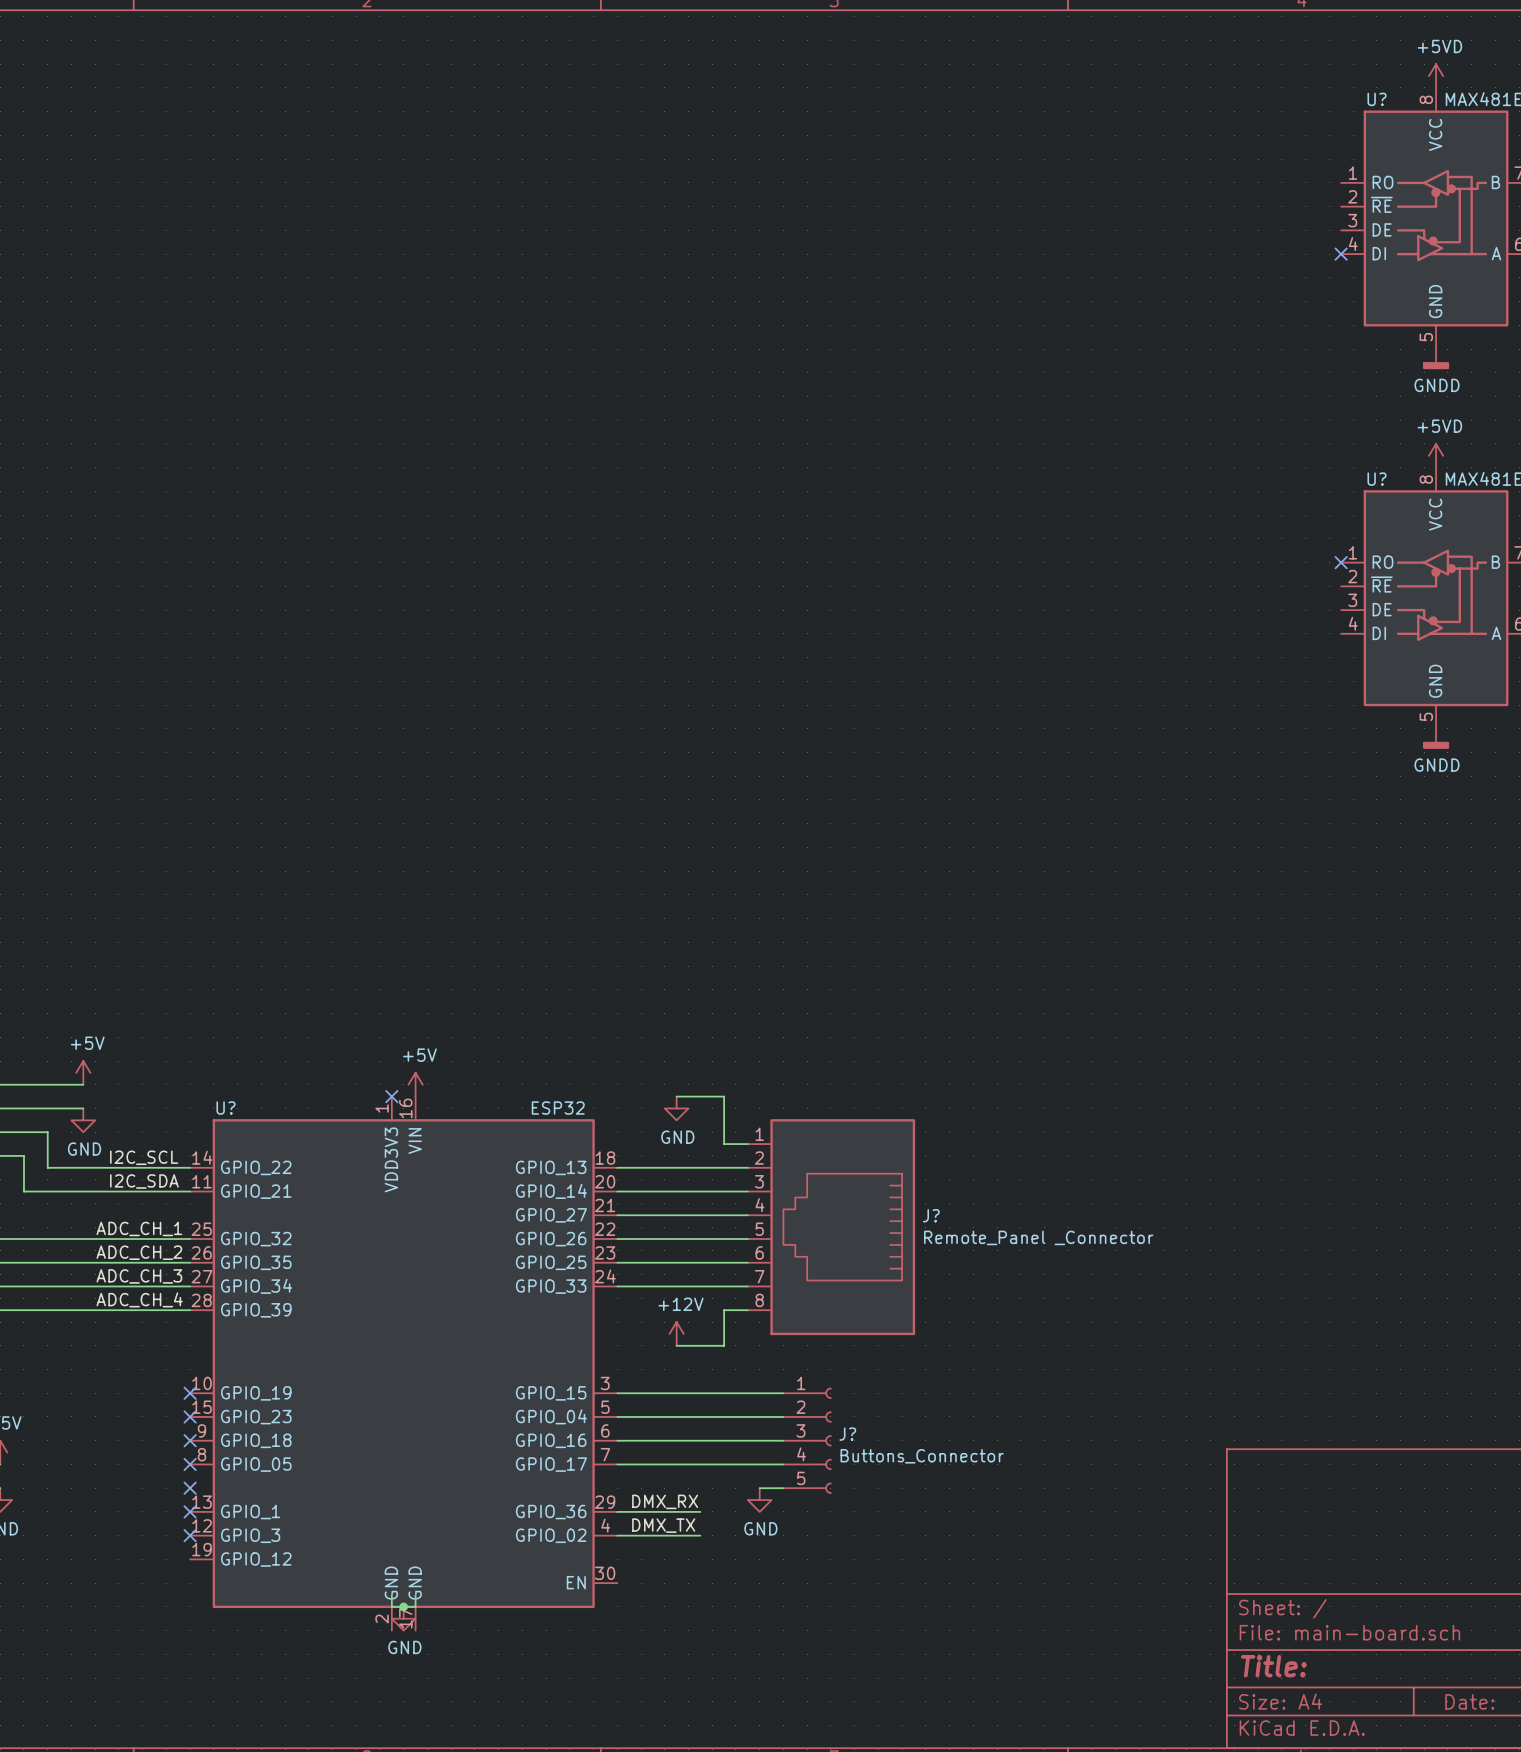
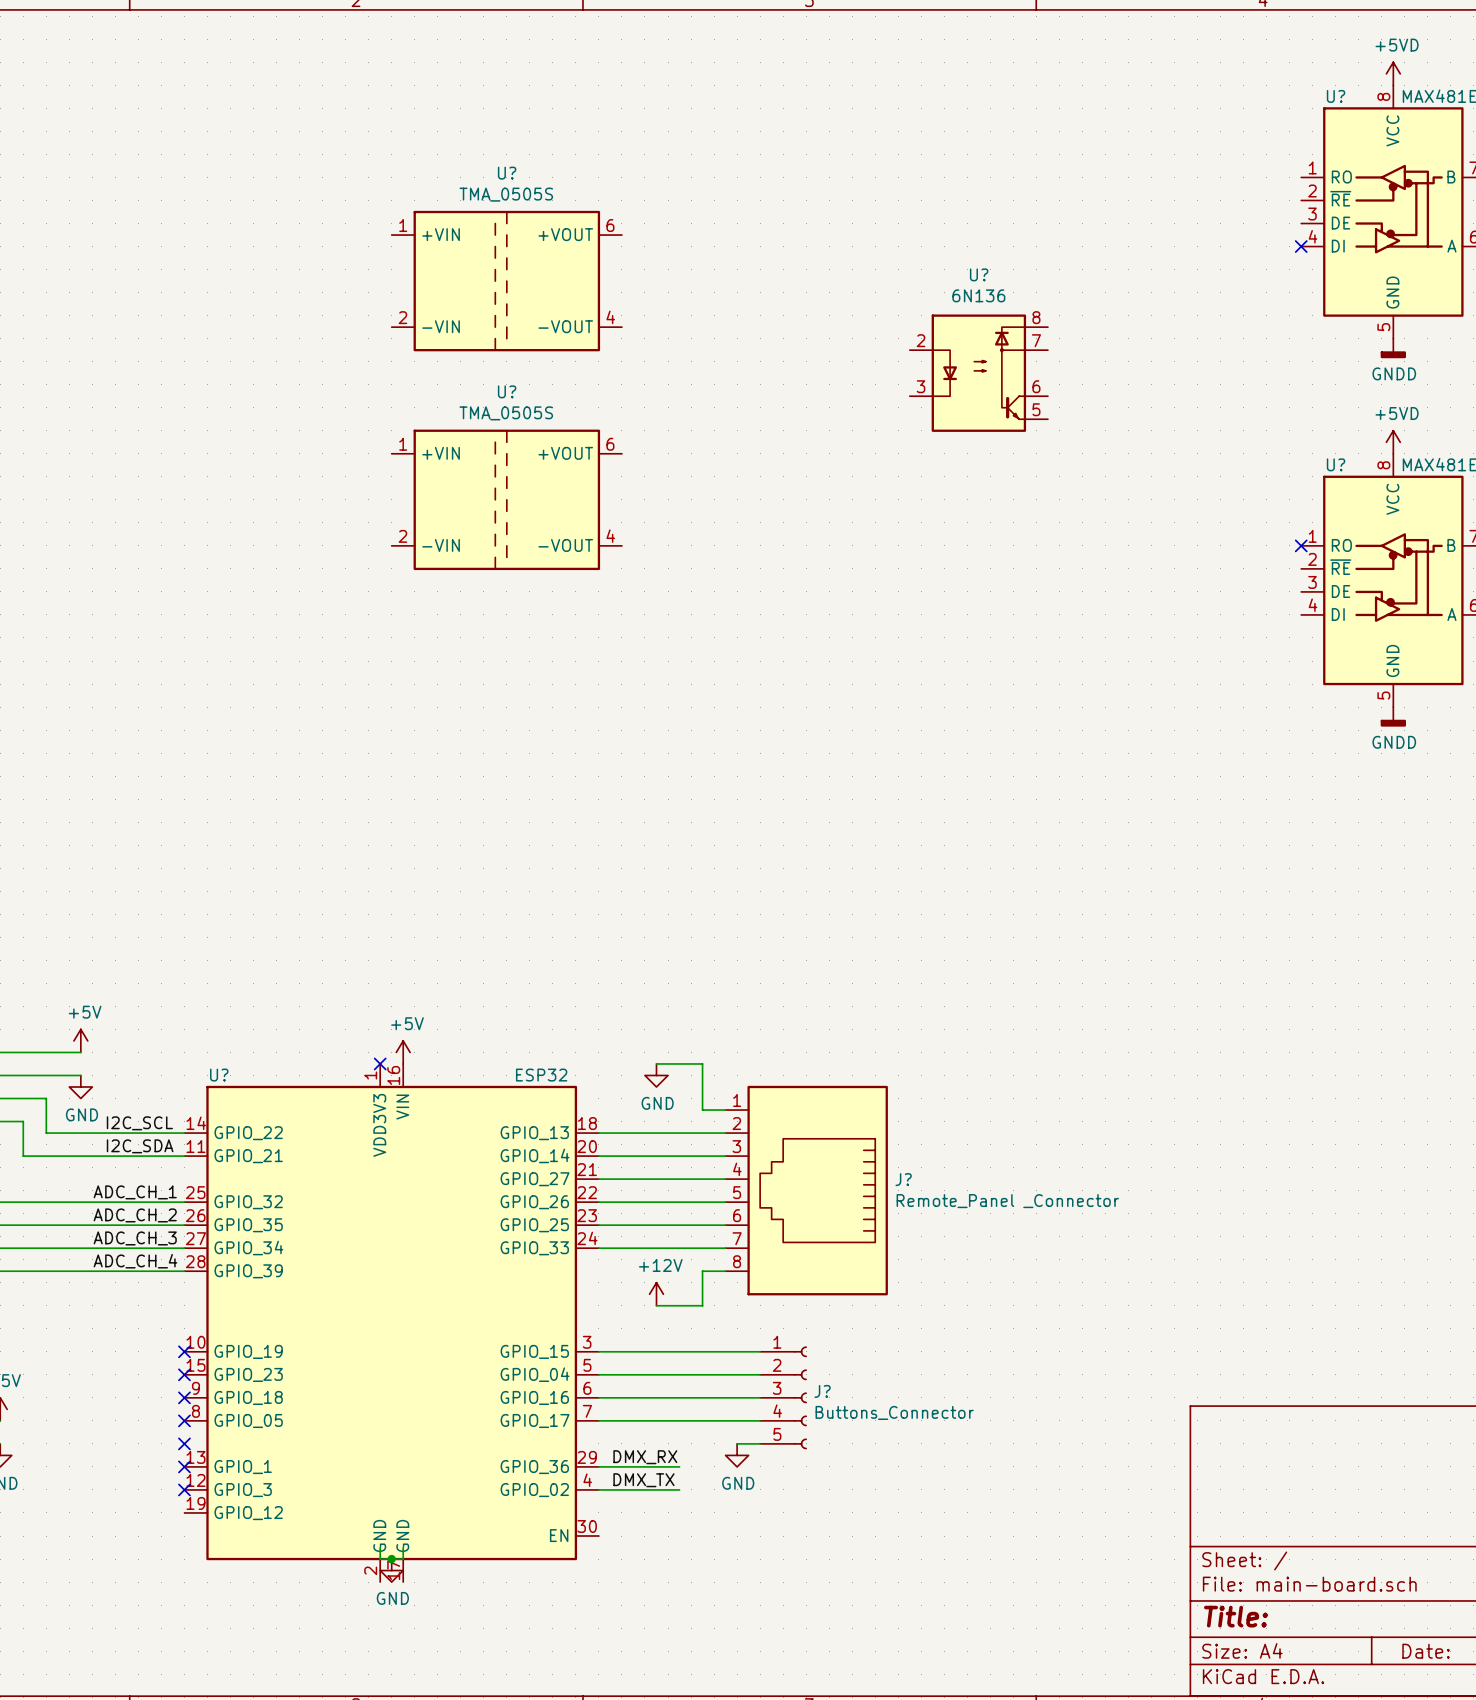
U?: none -> TMA_0505S (506, 281)
U?: none -> 6N136 (978, 373)
U?: none -> TMA_0505S (506, 499)

